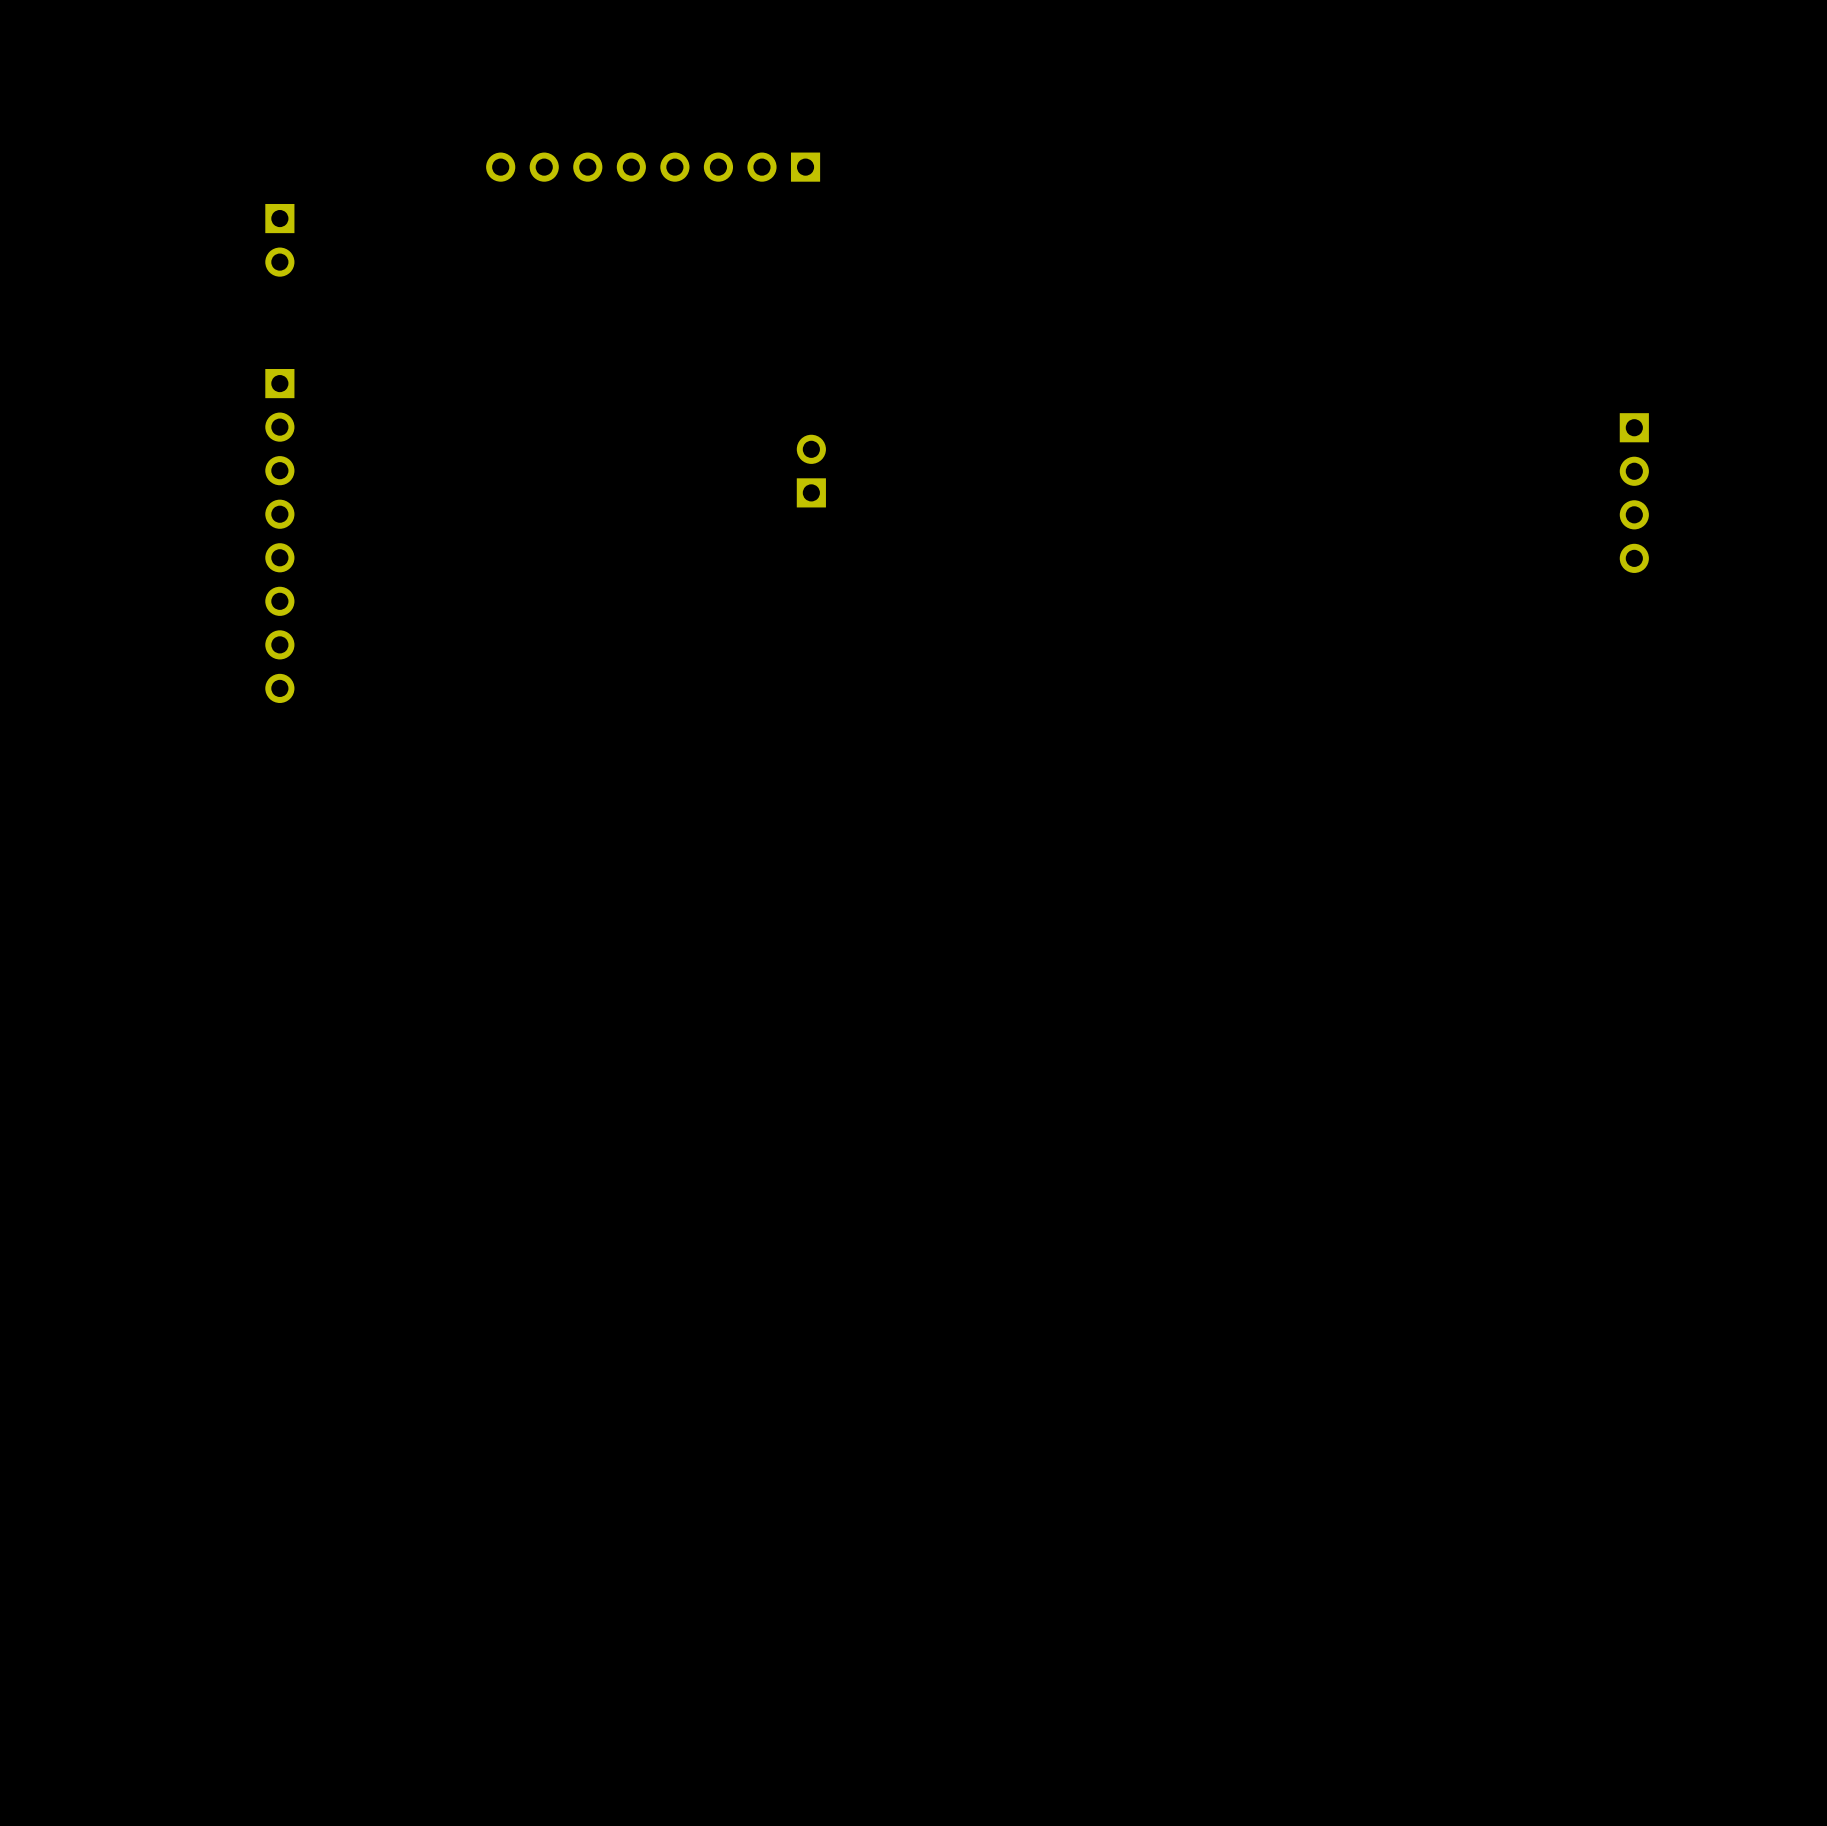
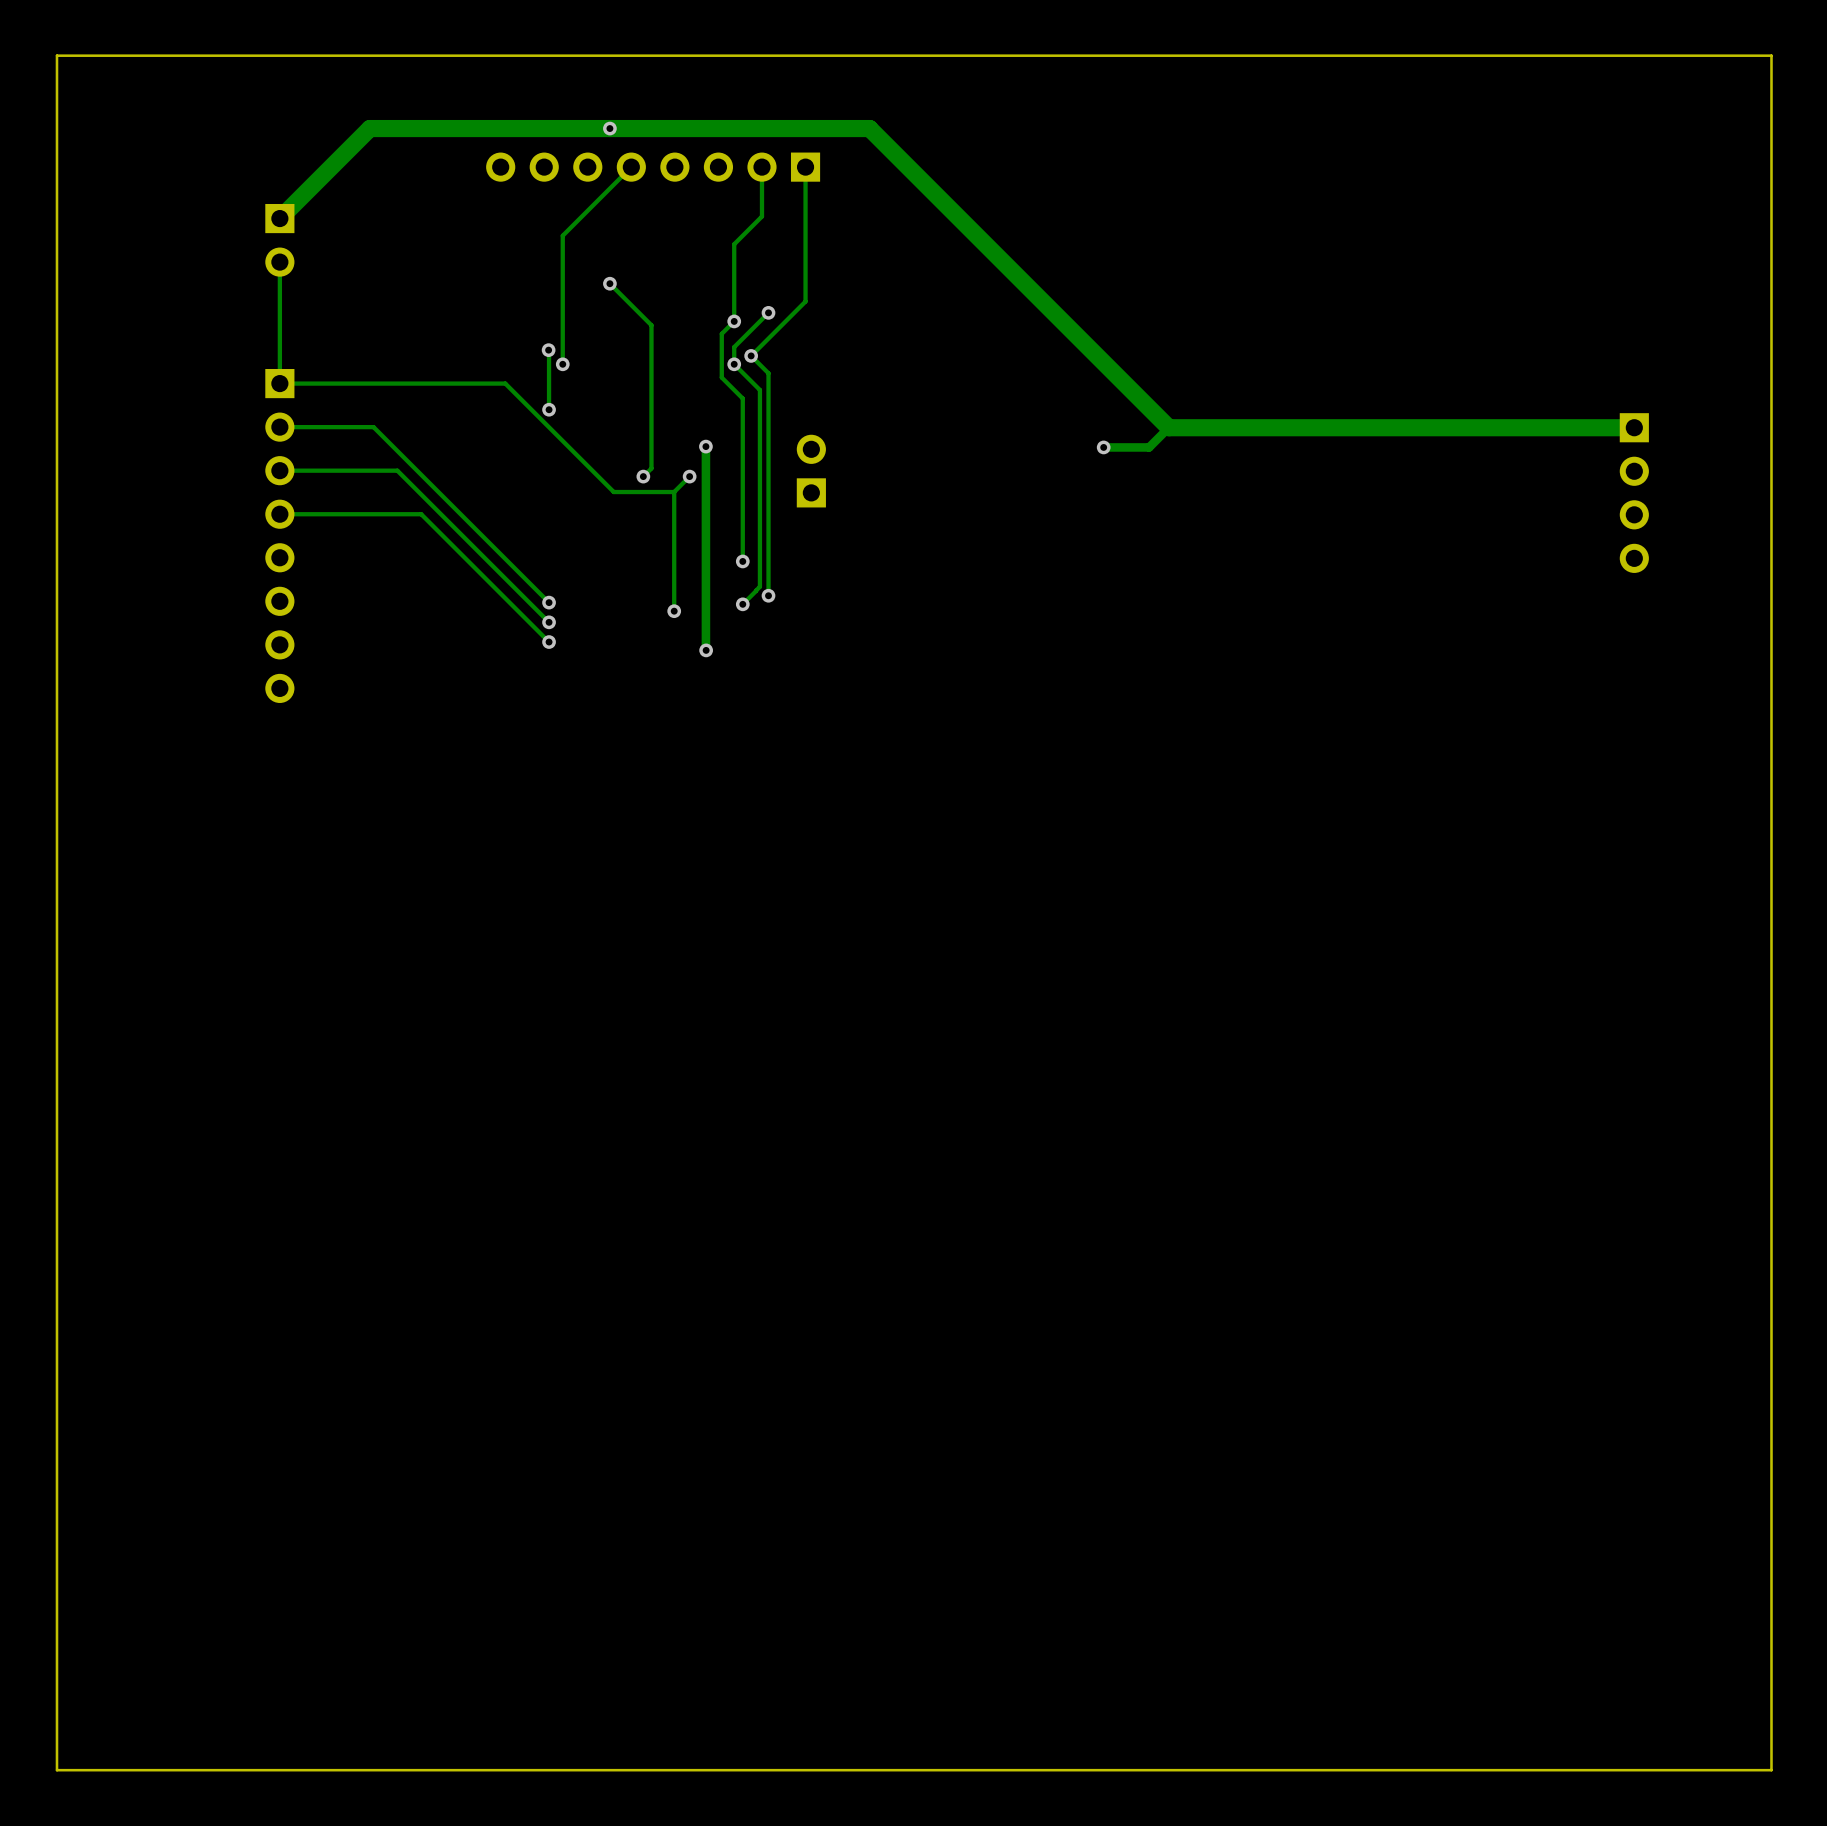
board edge: none -> (1771, 55) (56, 55) (56, 1770) (1771, 1770) (1771, 55)
via: none -> (609, 128)
track: none -> (631, 167) (562, 235) (562, 364)
track: none -> (761, 167) (761, 216) (734, 244) (734, 321) (721, 333) (721, 377) (742, 398) (742, 561)
track: none -> (805, 167) (805, 301) (751, 355) (768, 373) (768, 595)
track: none -> (279, 218) (369, 128) (869, 128) (1168, 427)
track: none -> (279, 262) (279, 383) (505, 383) (613, 492) (674, 492)
track: none -> (609, 283) (651, 325) (651, 468) (643, 476)
via: none -> (609, 283)
track: none -> (768, 312) (734, 347) (734, 364) (759, 390) (759, 586) (742, 604)
via: none -> (768, 312)
via: none -> (734, 321)
track: none -> (548, 350) (549, 409)
via: none -> (548, 350)
via: none -> (751, 355)
via: none -> (562, 364)
via: none -> (734, 364)
via: none -> (549, 409)
track: none -> (279, 427) (373, 427) (549, 602)
track: none -> (1168, 427) (1149, 447) (1103, 447)
track: none -> (1634, 427) (1168, 427)
track: none -> (705, 446) (705, 650)
via: none -> (705, 446)
via: none -> (1103, 447)
track: none -> (279, 470) (397, 470) (549, 622)
via: none -> (643, 476)
track: none -> (689, 476) (674, 492)
via: none -> (689, 476)
track: none -> (674, 492) (674, 611)
track: none -> (279, 514) (421, 514) (549, 642)
via: none -> (742, 561)
via: none -> (768, 595)
via: none -> (549, 602)
via: none -> (742, 604)
via: none -> (674, 611)
via: none -> (549, 622)
via: none -> (549, 642)
via: none -> (706, 650)

